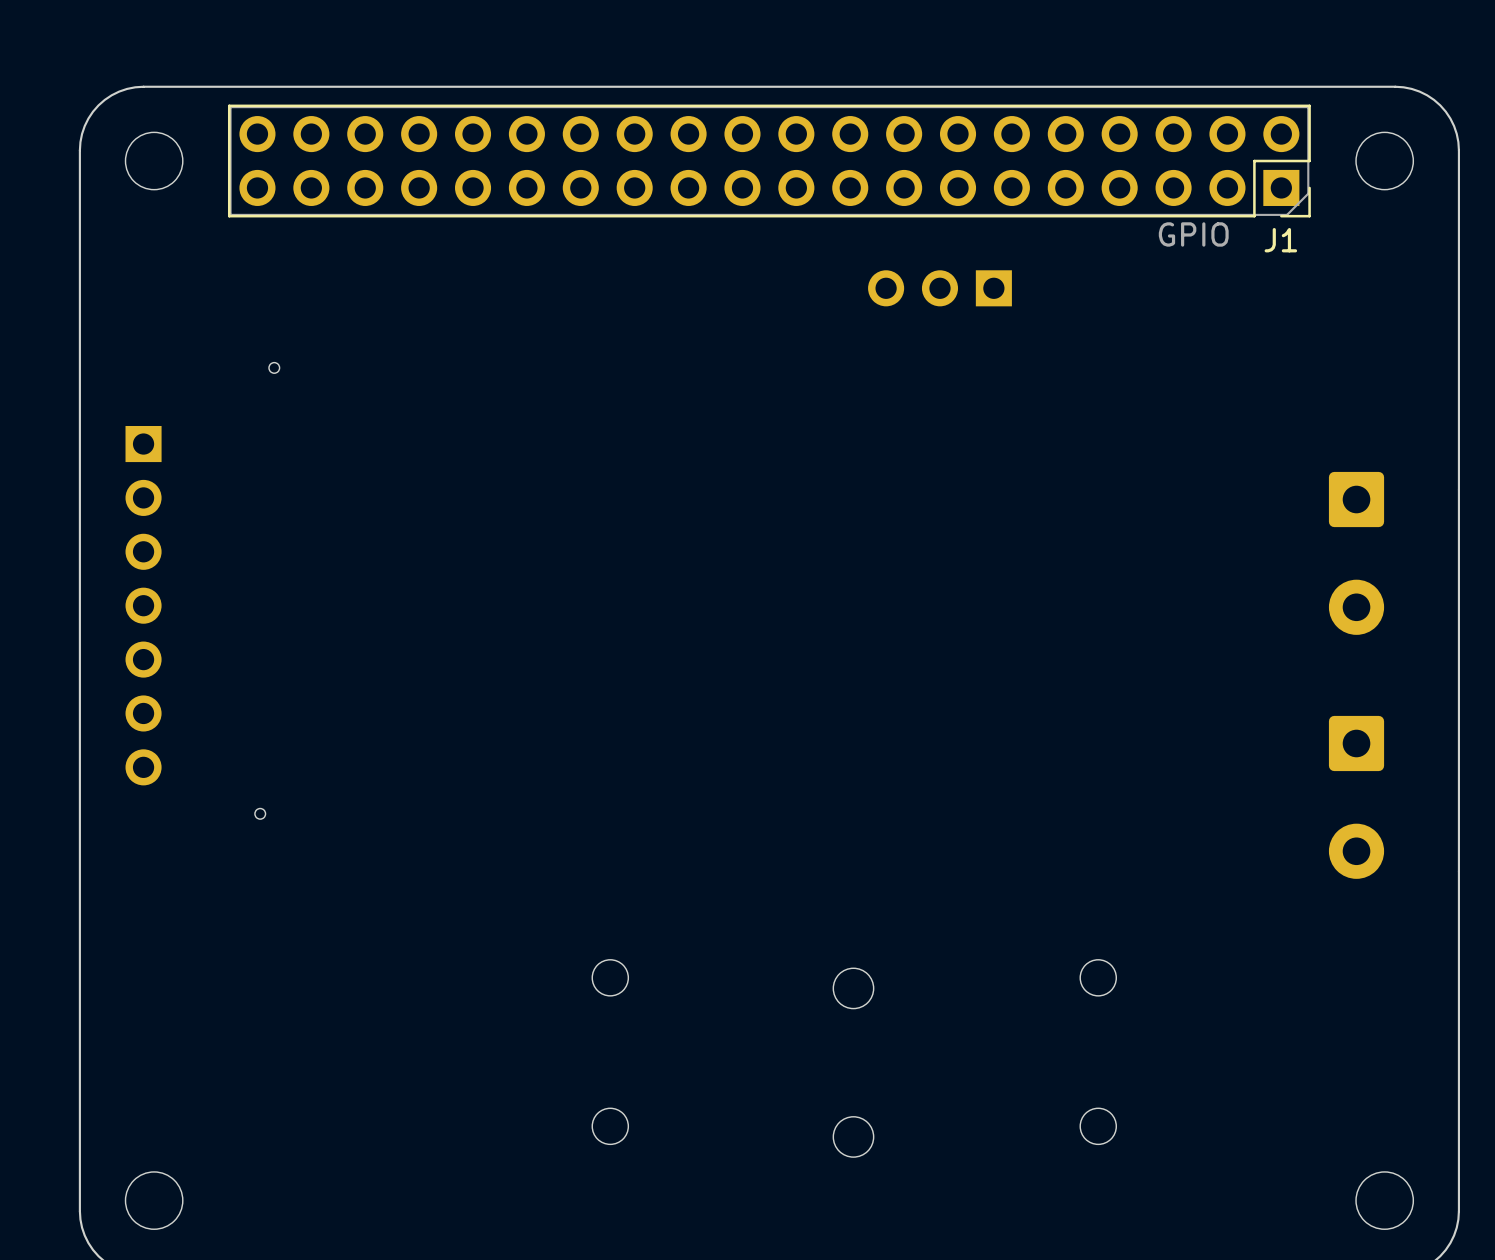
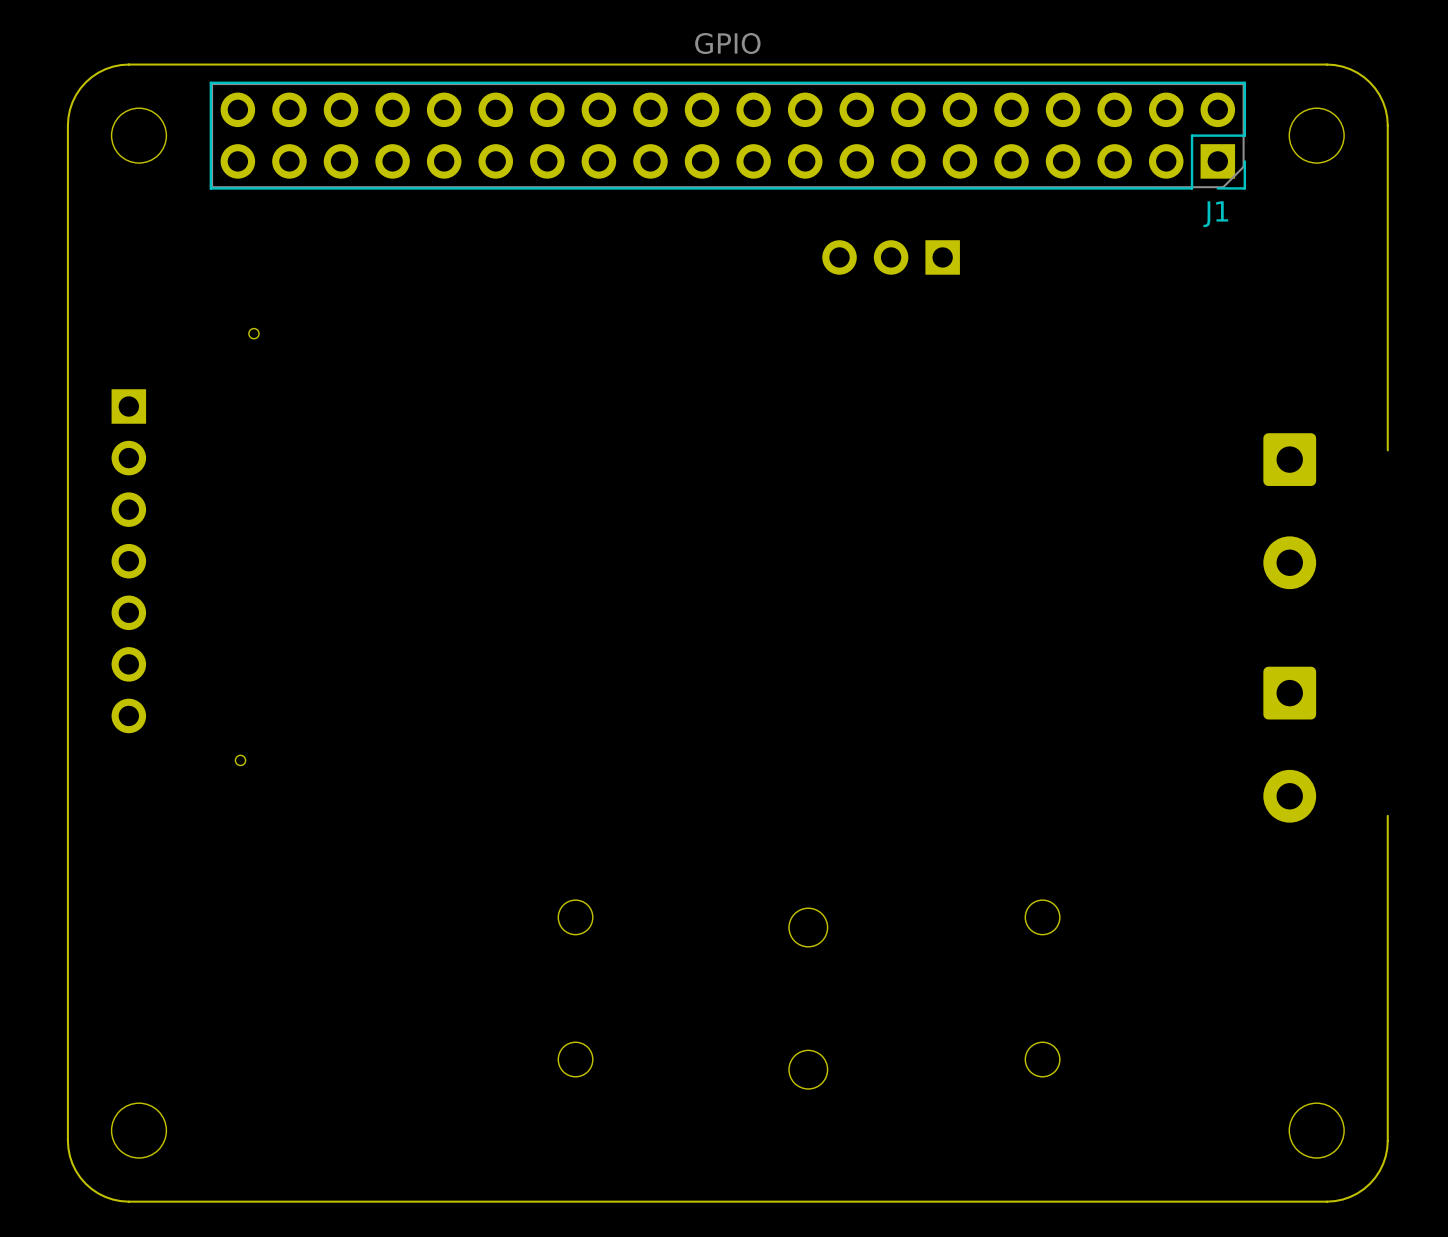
J1 value position: GPIO (1193, 234) -> GPIO (727, 43)
board edge: (1458, 489) (1458, 871) -> none

